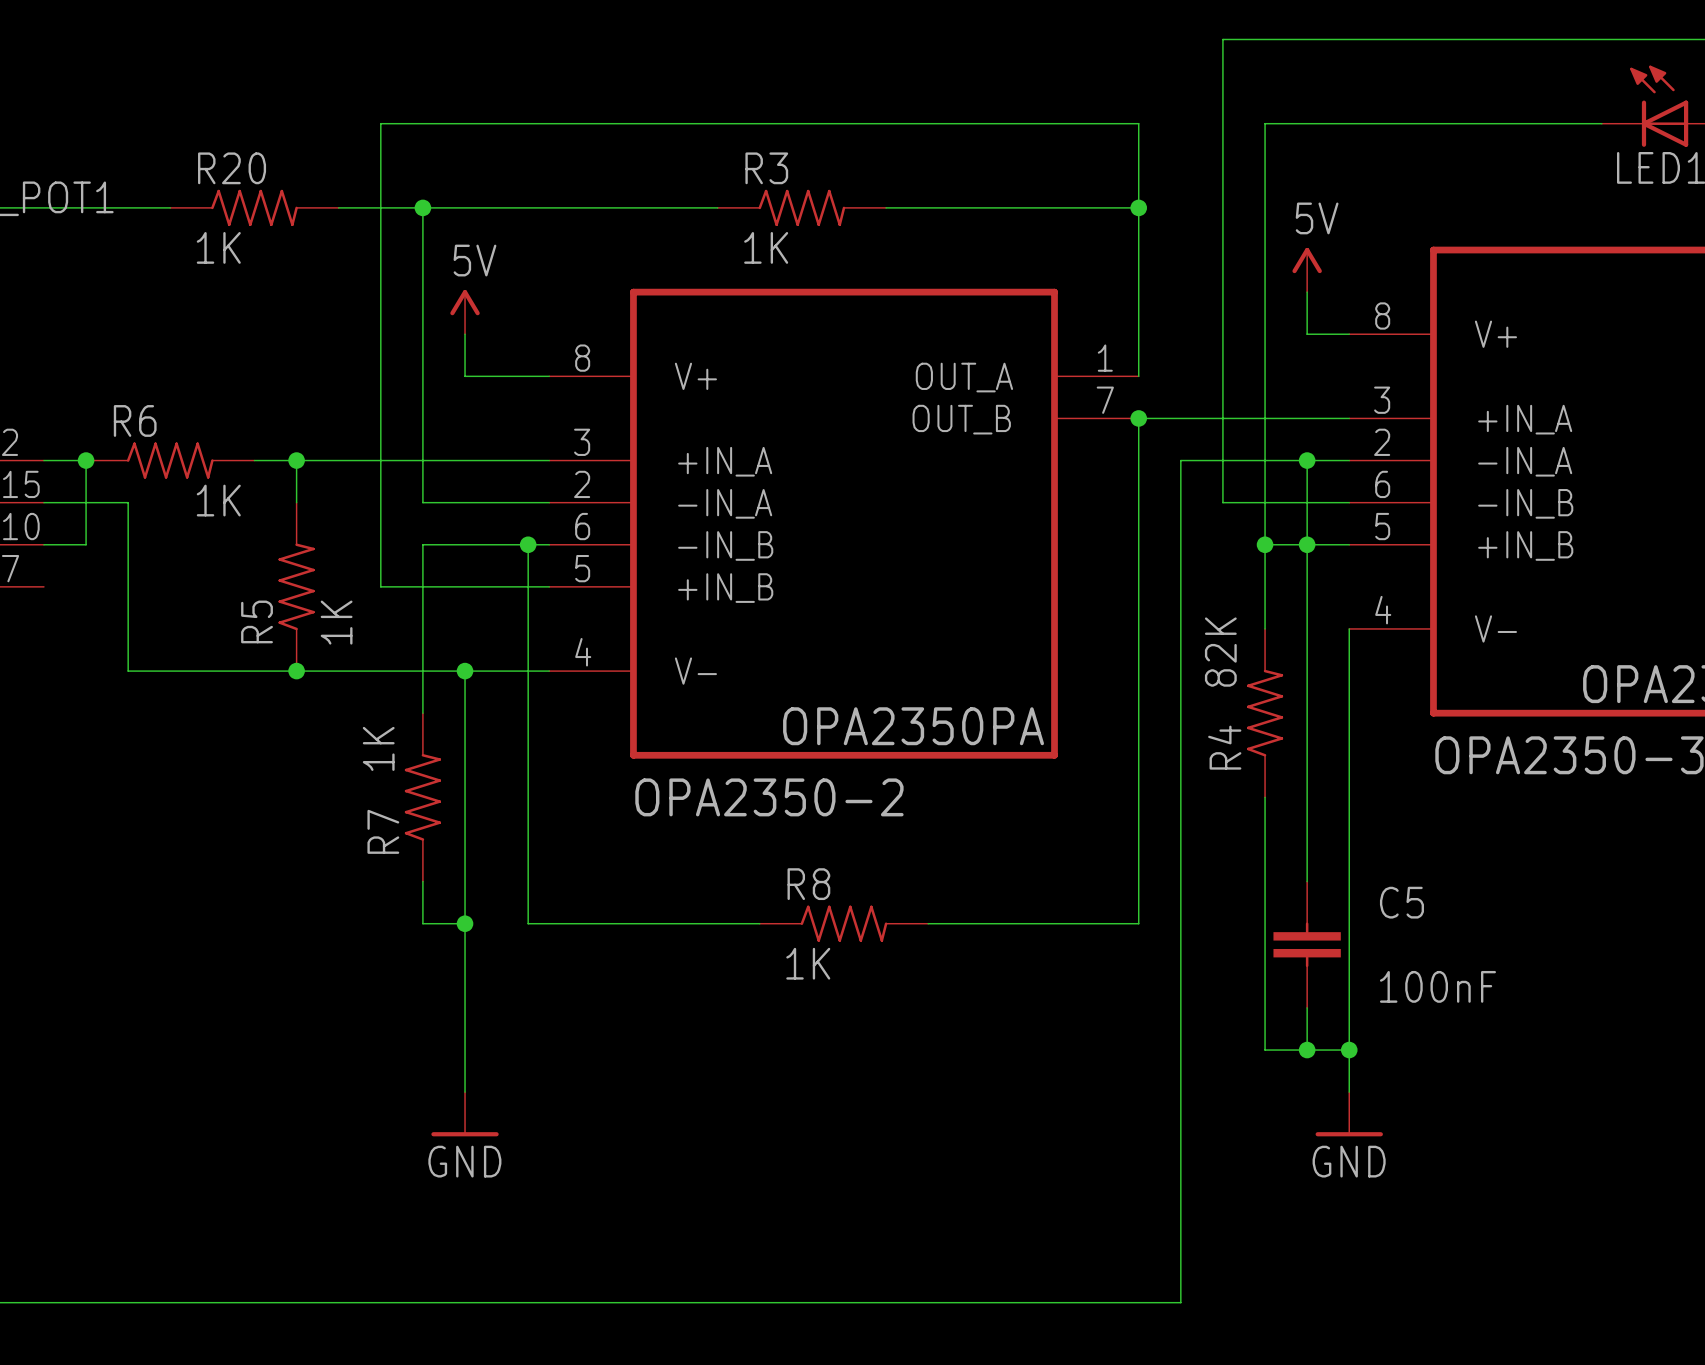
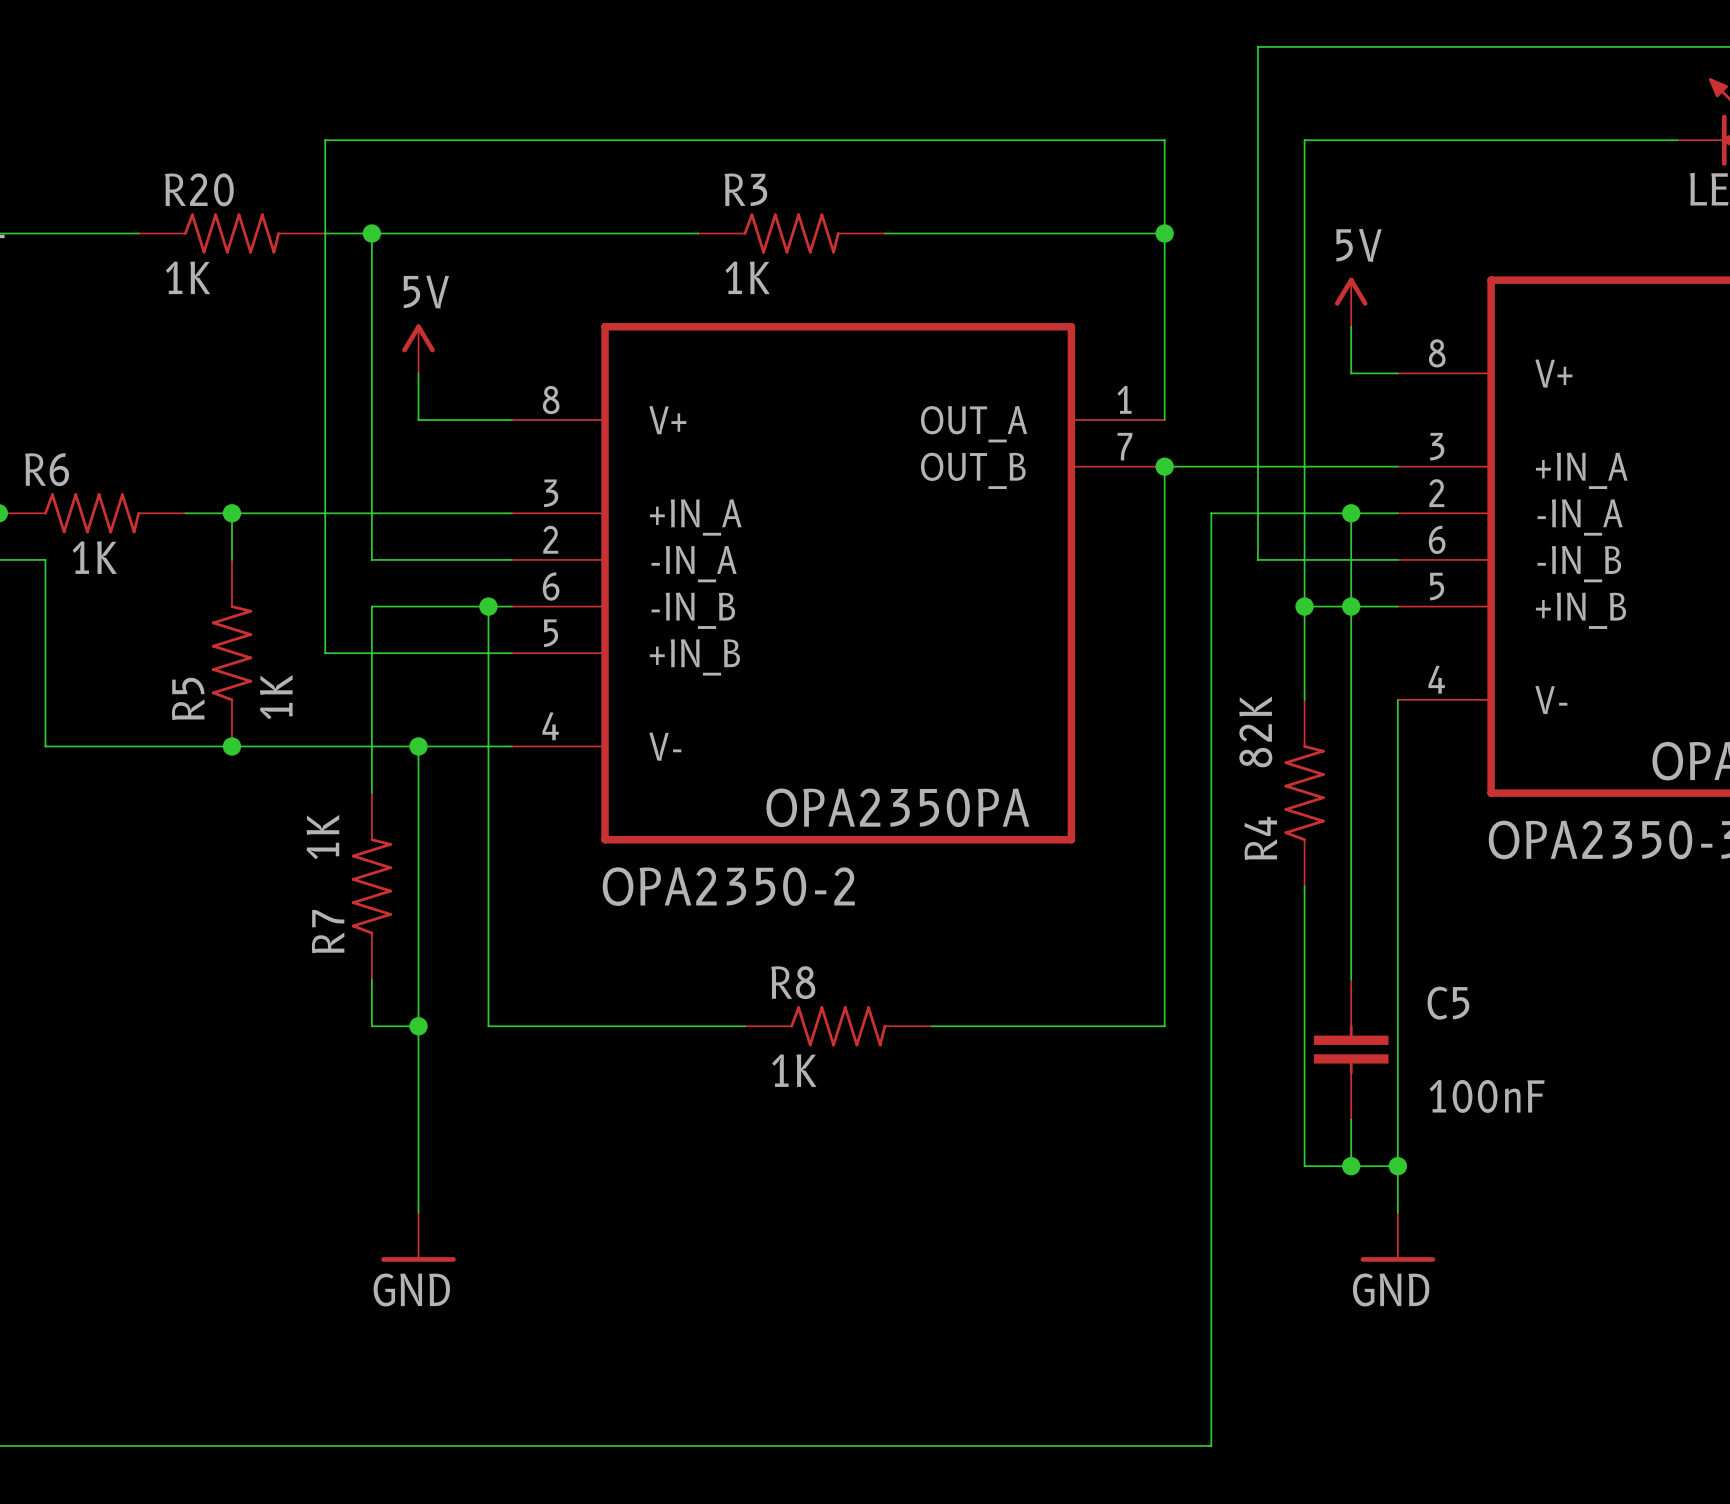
R20 position: (254, 207) -> (231, 233)
R6 value position: 1K (218, 500) -> 1K (94, 557)

